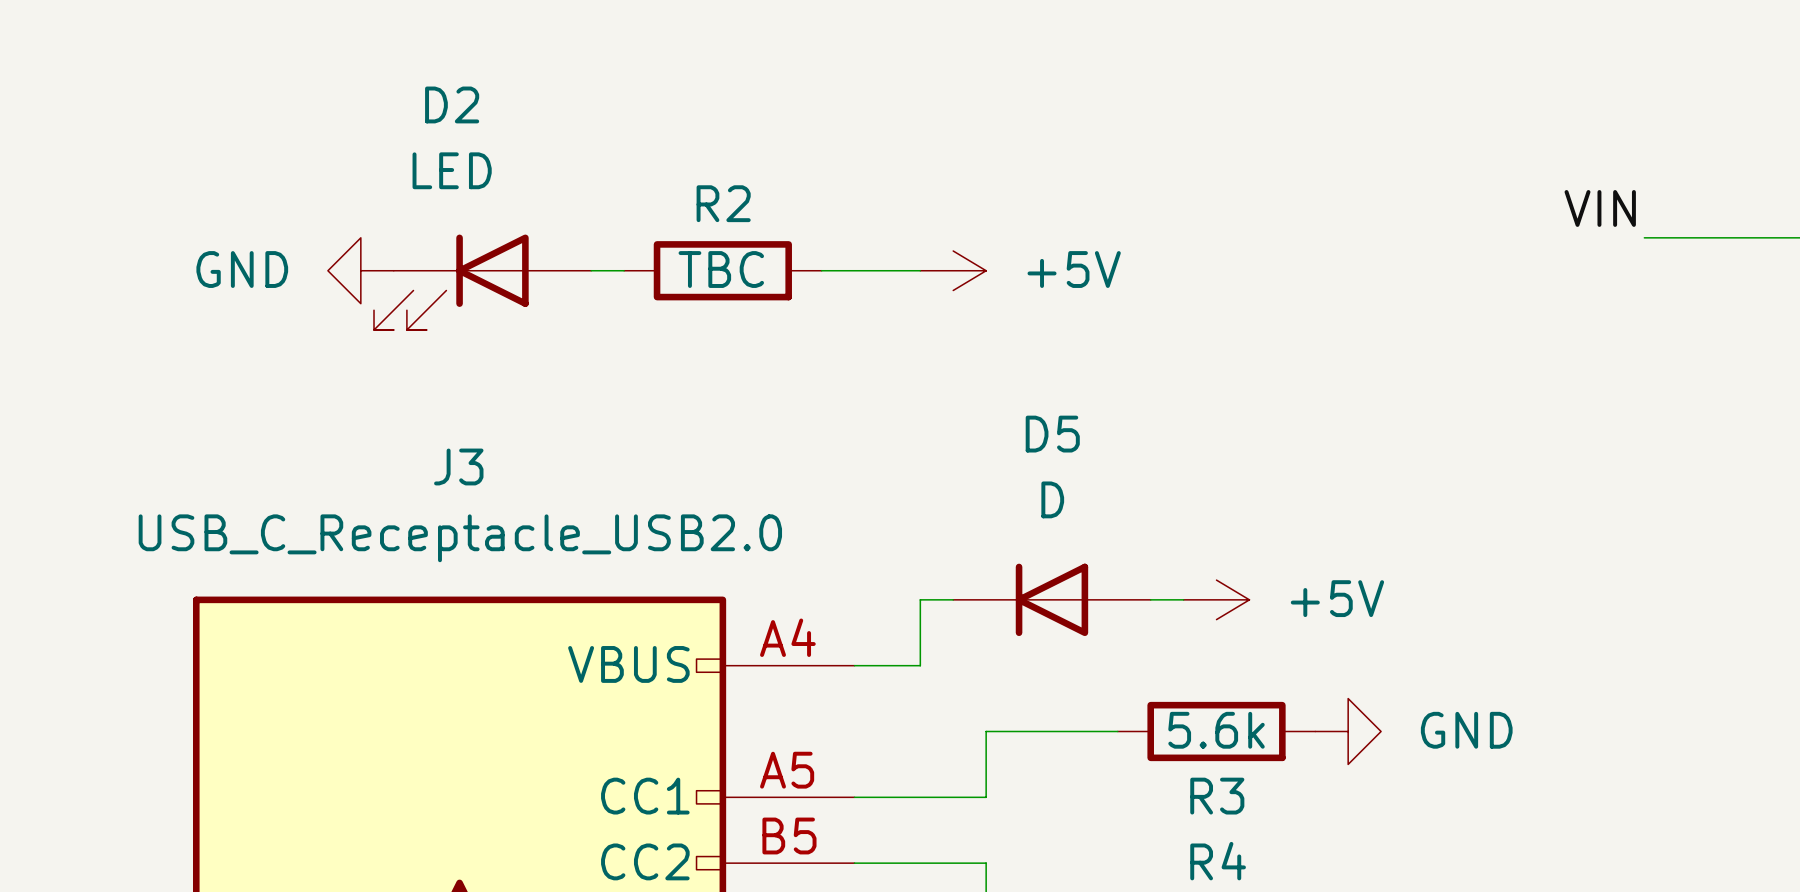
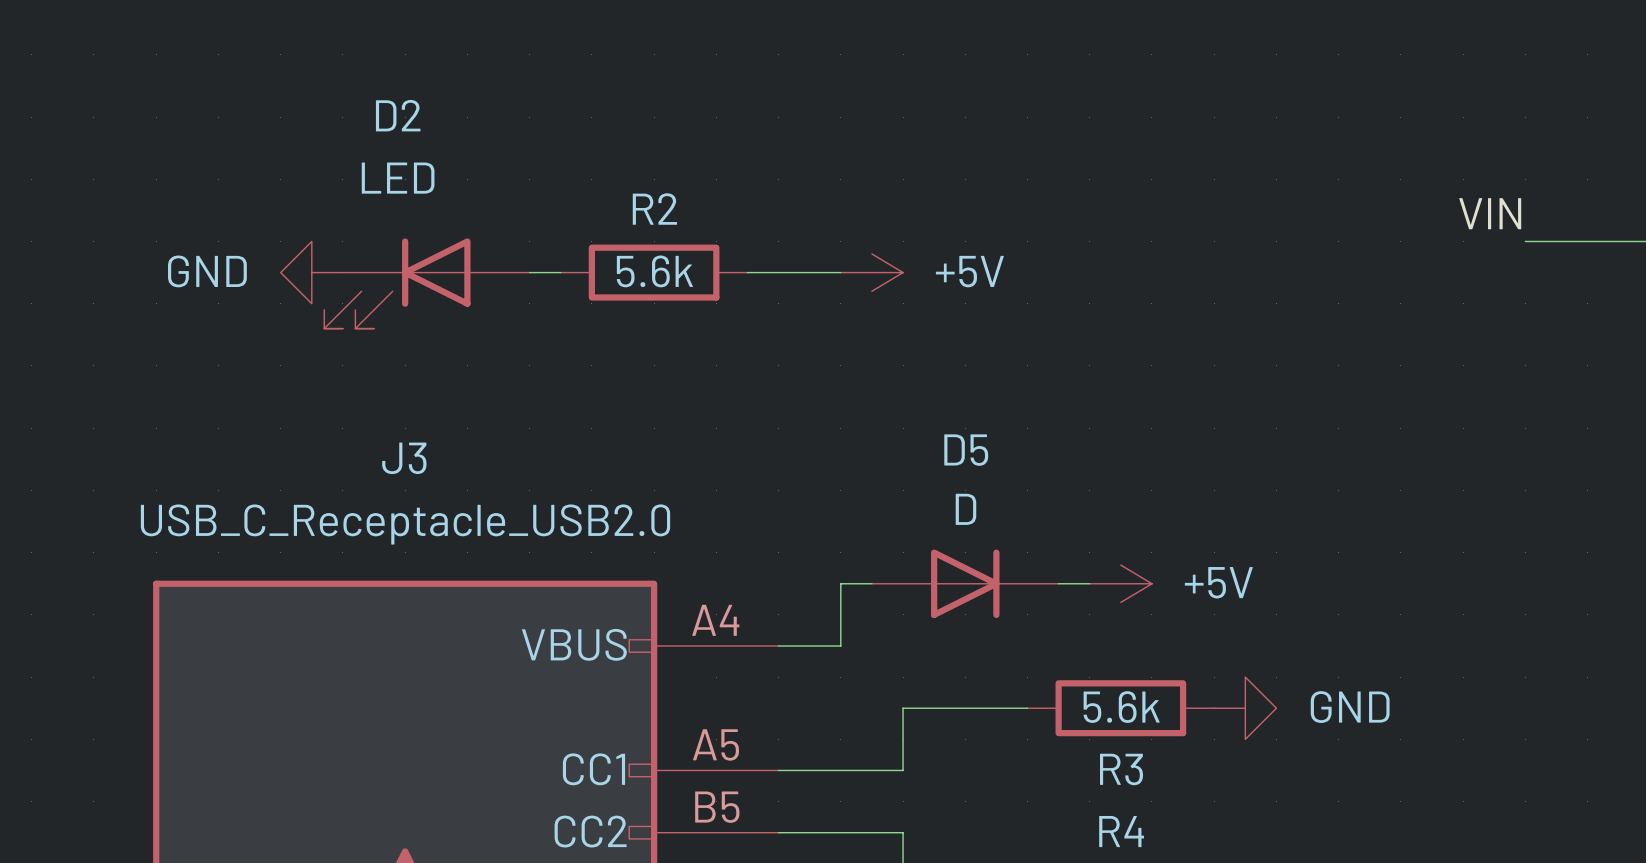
R2 value: TBC (721, 269) -> 5.6k (654, 271)
D5 rotation: 0° (1051, 599) -> 180° (965, 583)

